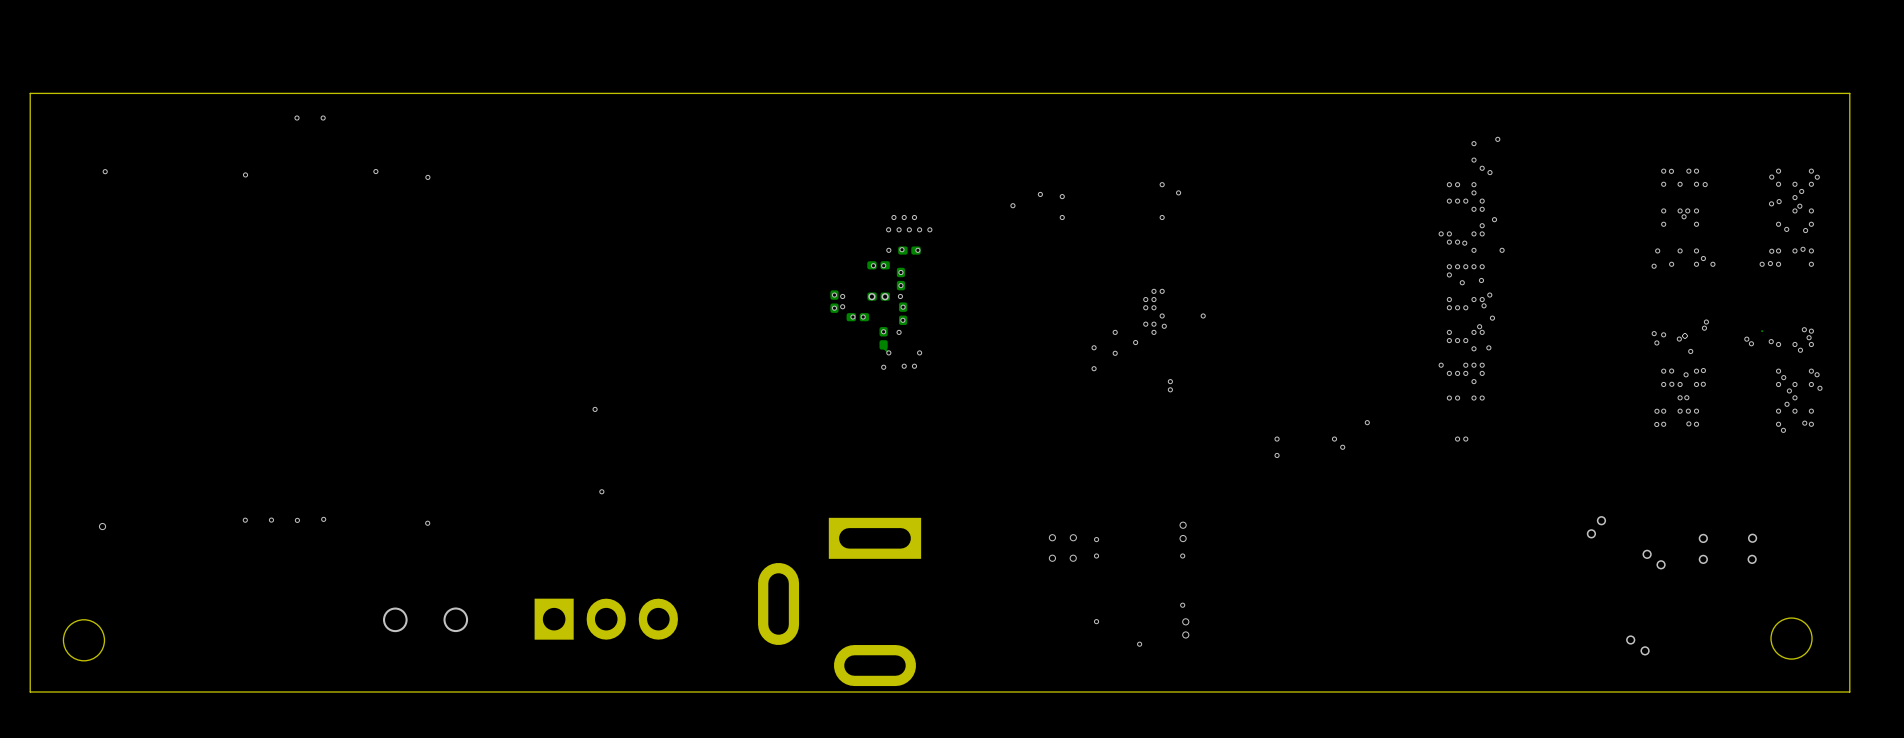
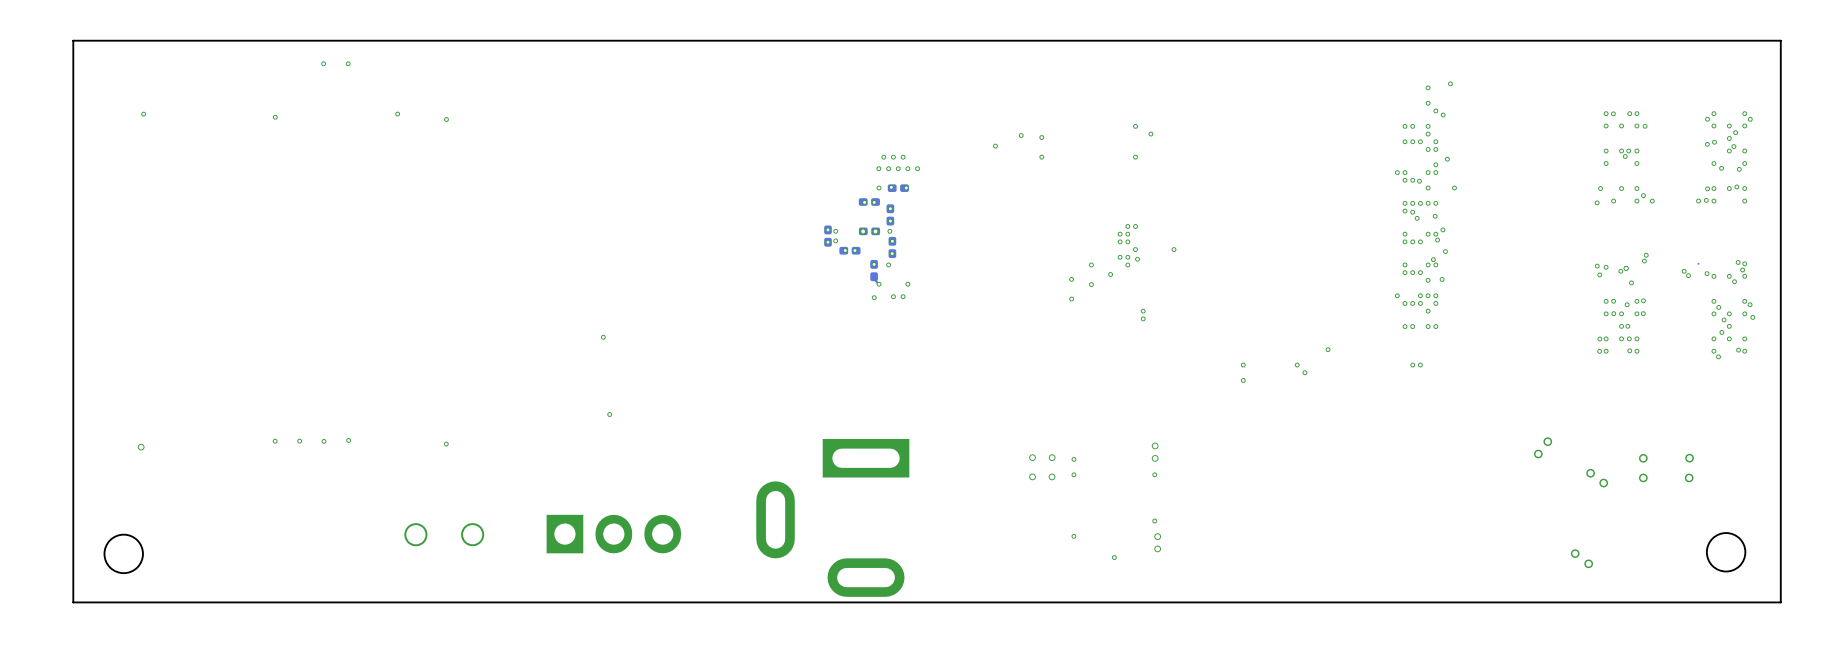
via: none -> (1412, 212)

